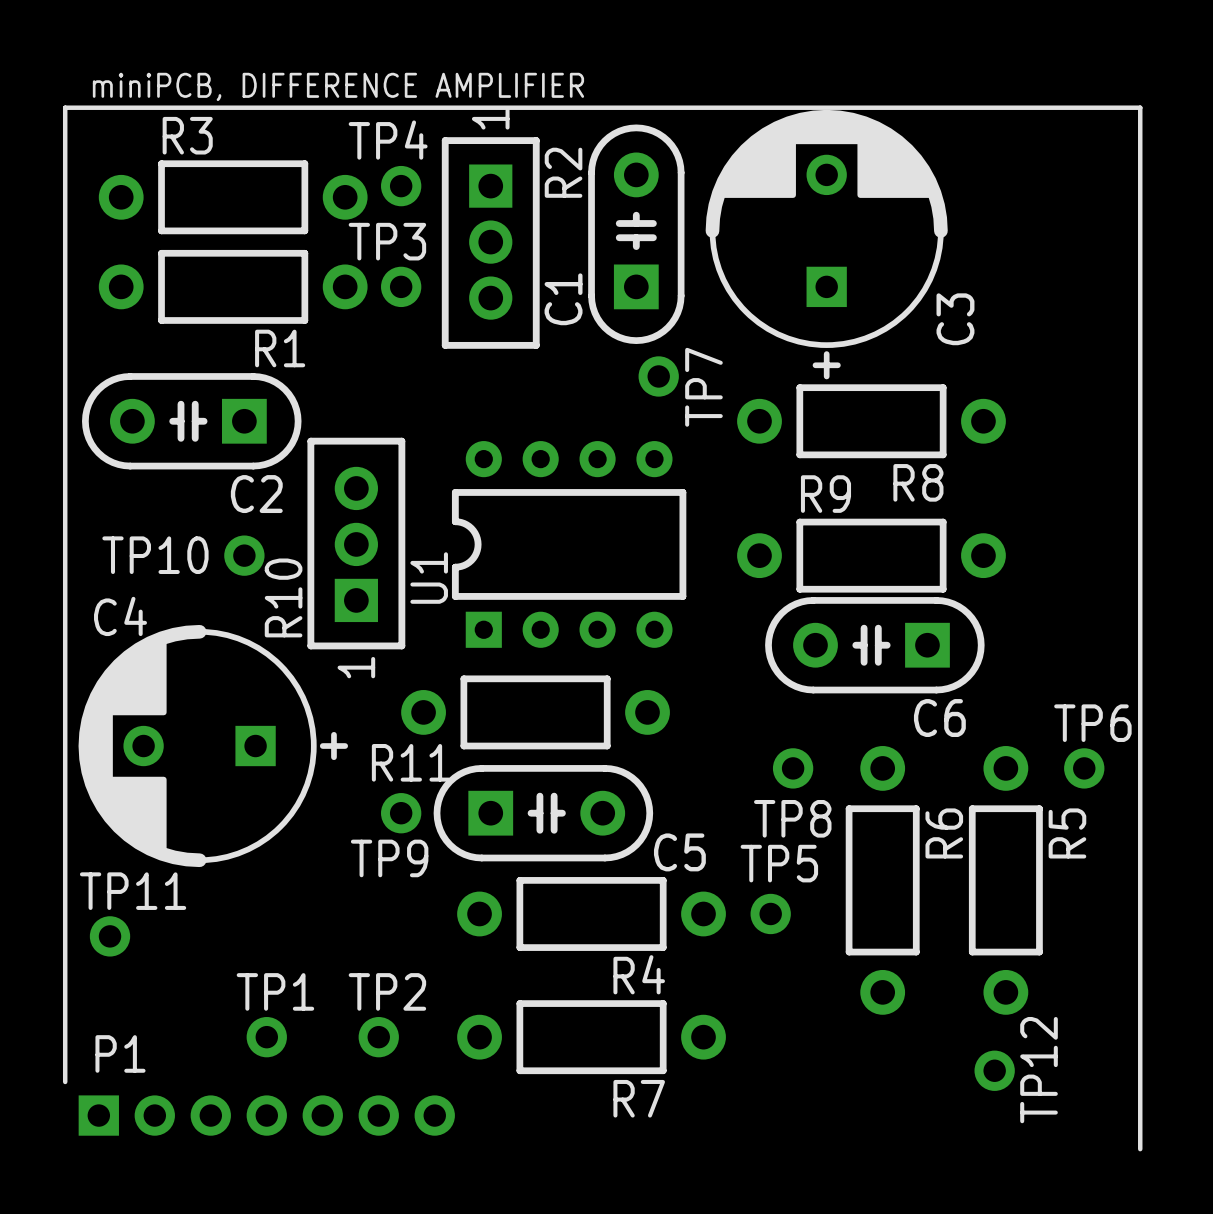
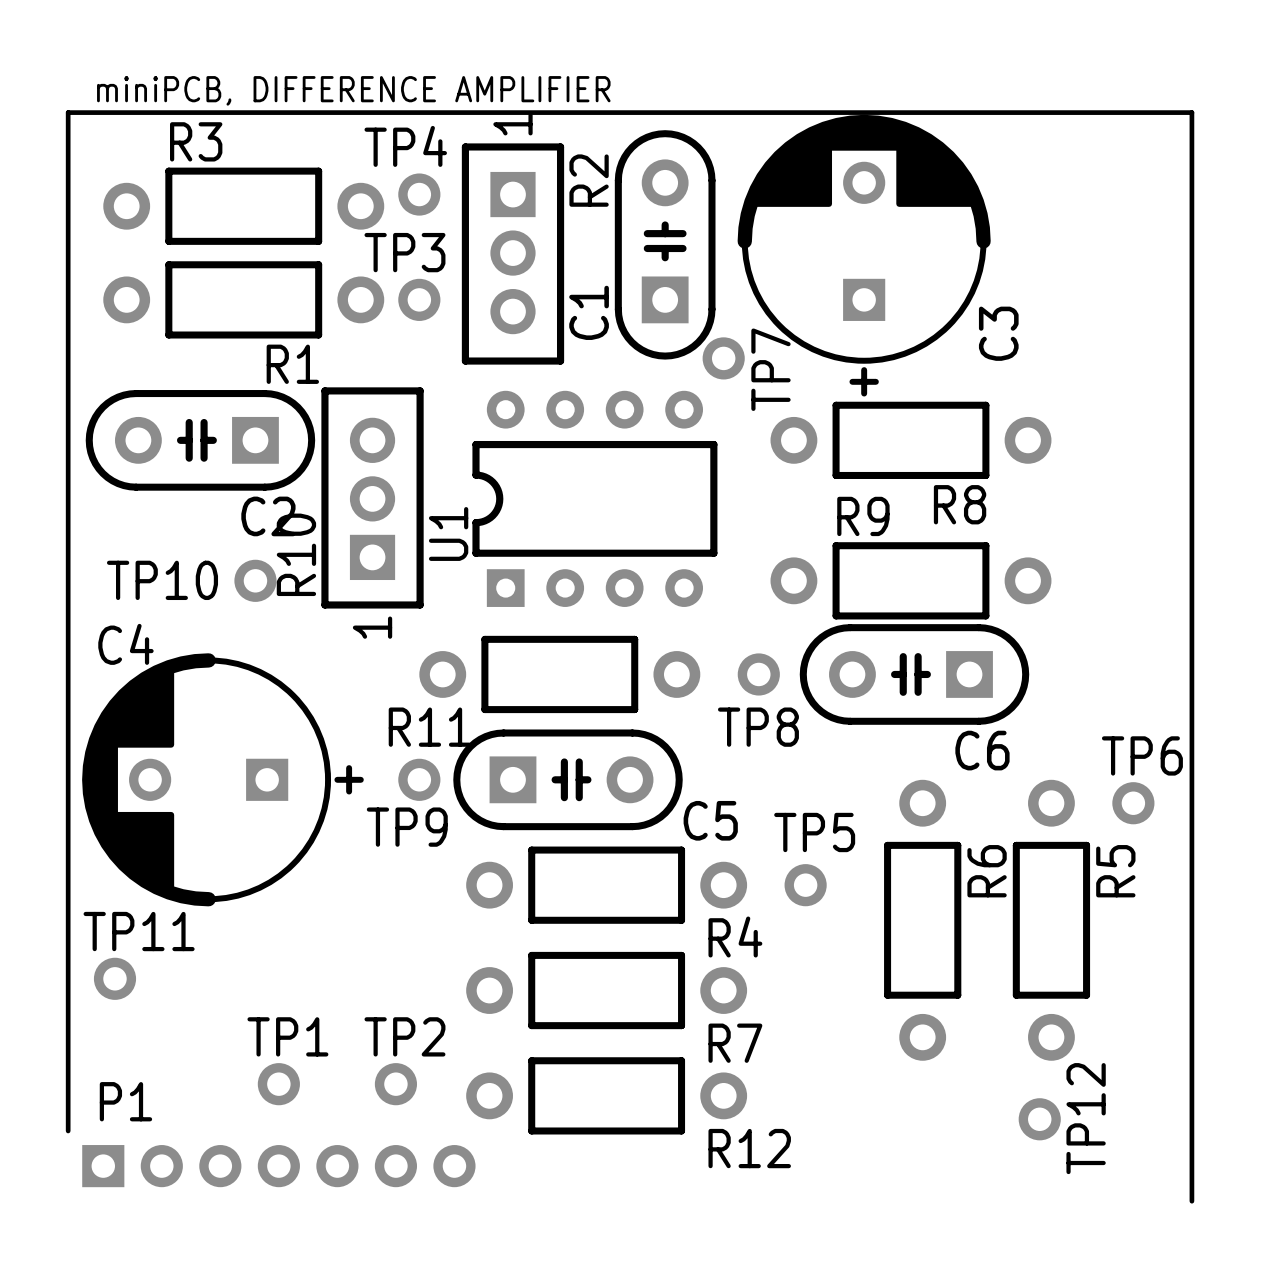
TP7 position: (658, 376) -> (723, 358)
R10 position: (356, 543) -> (372, 497)
U1 position: (569, 544) -> (594, 498)
R11 position: (535, 712) -> (559, 674)
TP8 position: (793, 768) -> (758, 674)
TP9 position: (401, 813) -> (419, 779)
C5 position: (543, 813) -> (568, 779)
R4 position: (591, 913) -> (606, 885)
TP5 position: (770, 913) -> (805, 885)
R4 name position: R4 (639, 974) -> R4 (735, 937)
R7 position: (591, 1037) -> (606, 990)
R12: none -> (606, 1095)
R7 name position: R7 (639, 1098) -> R7 (735, 1043)

